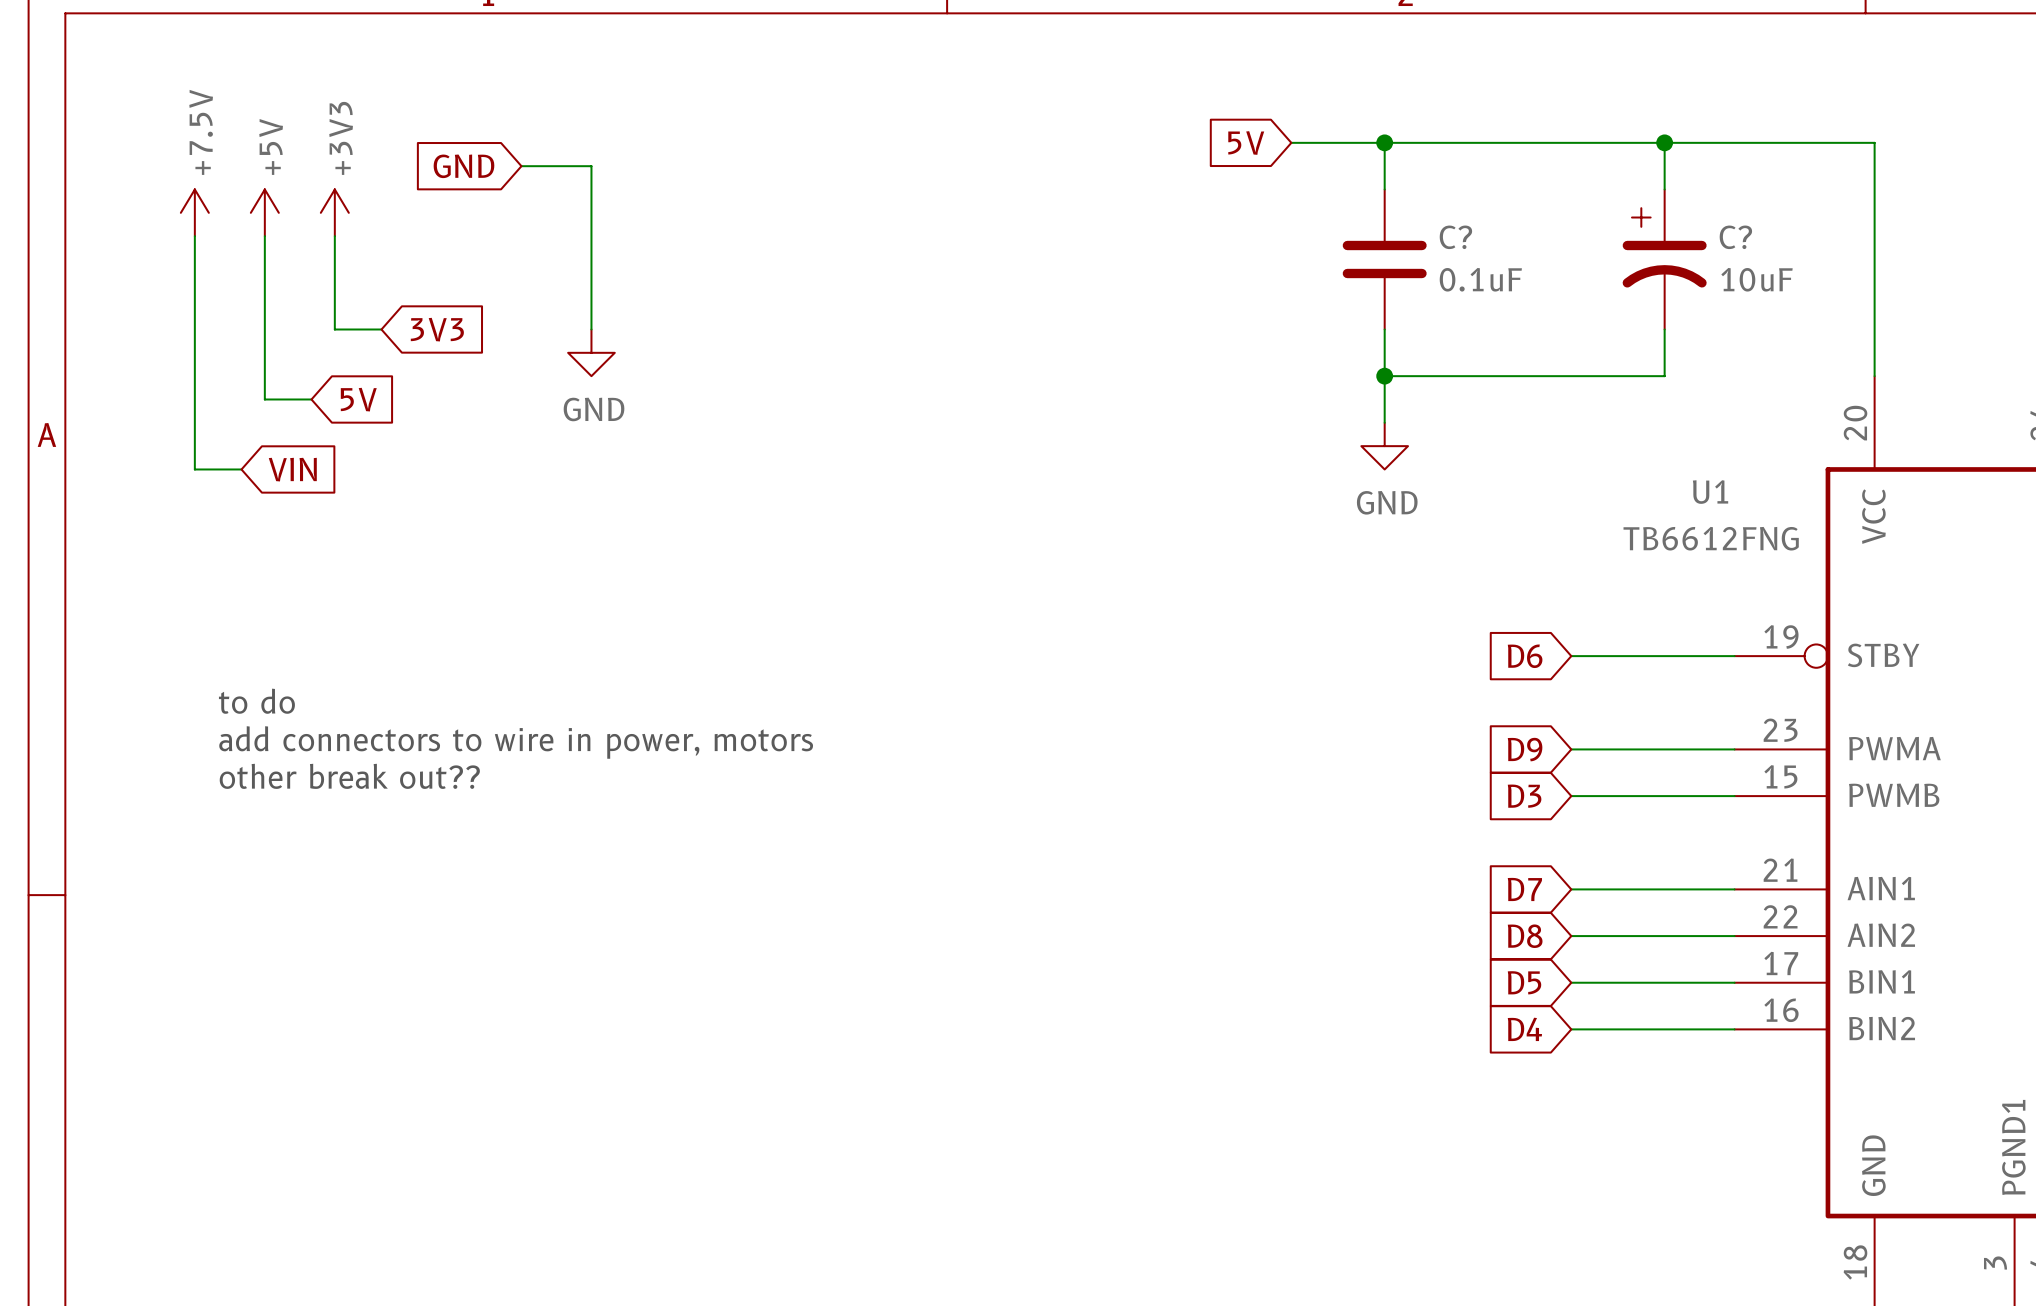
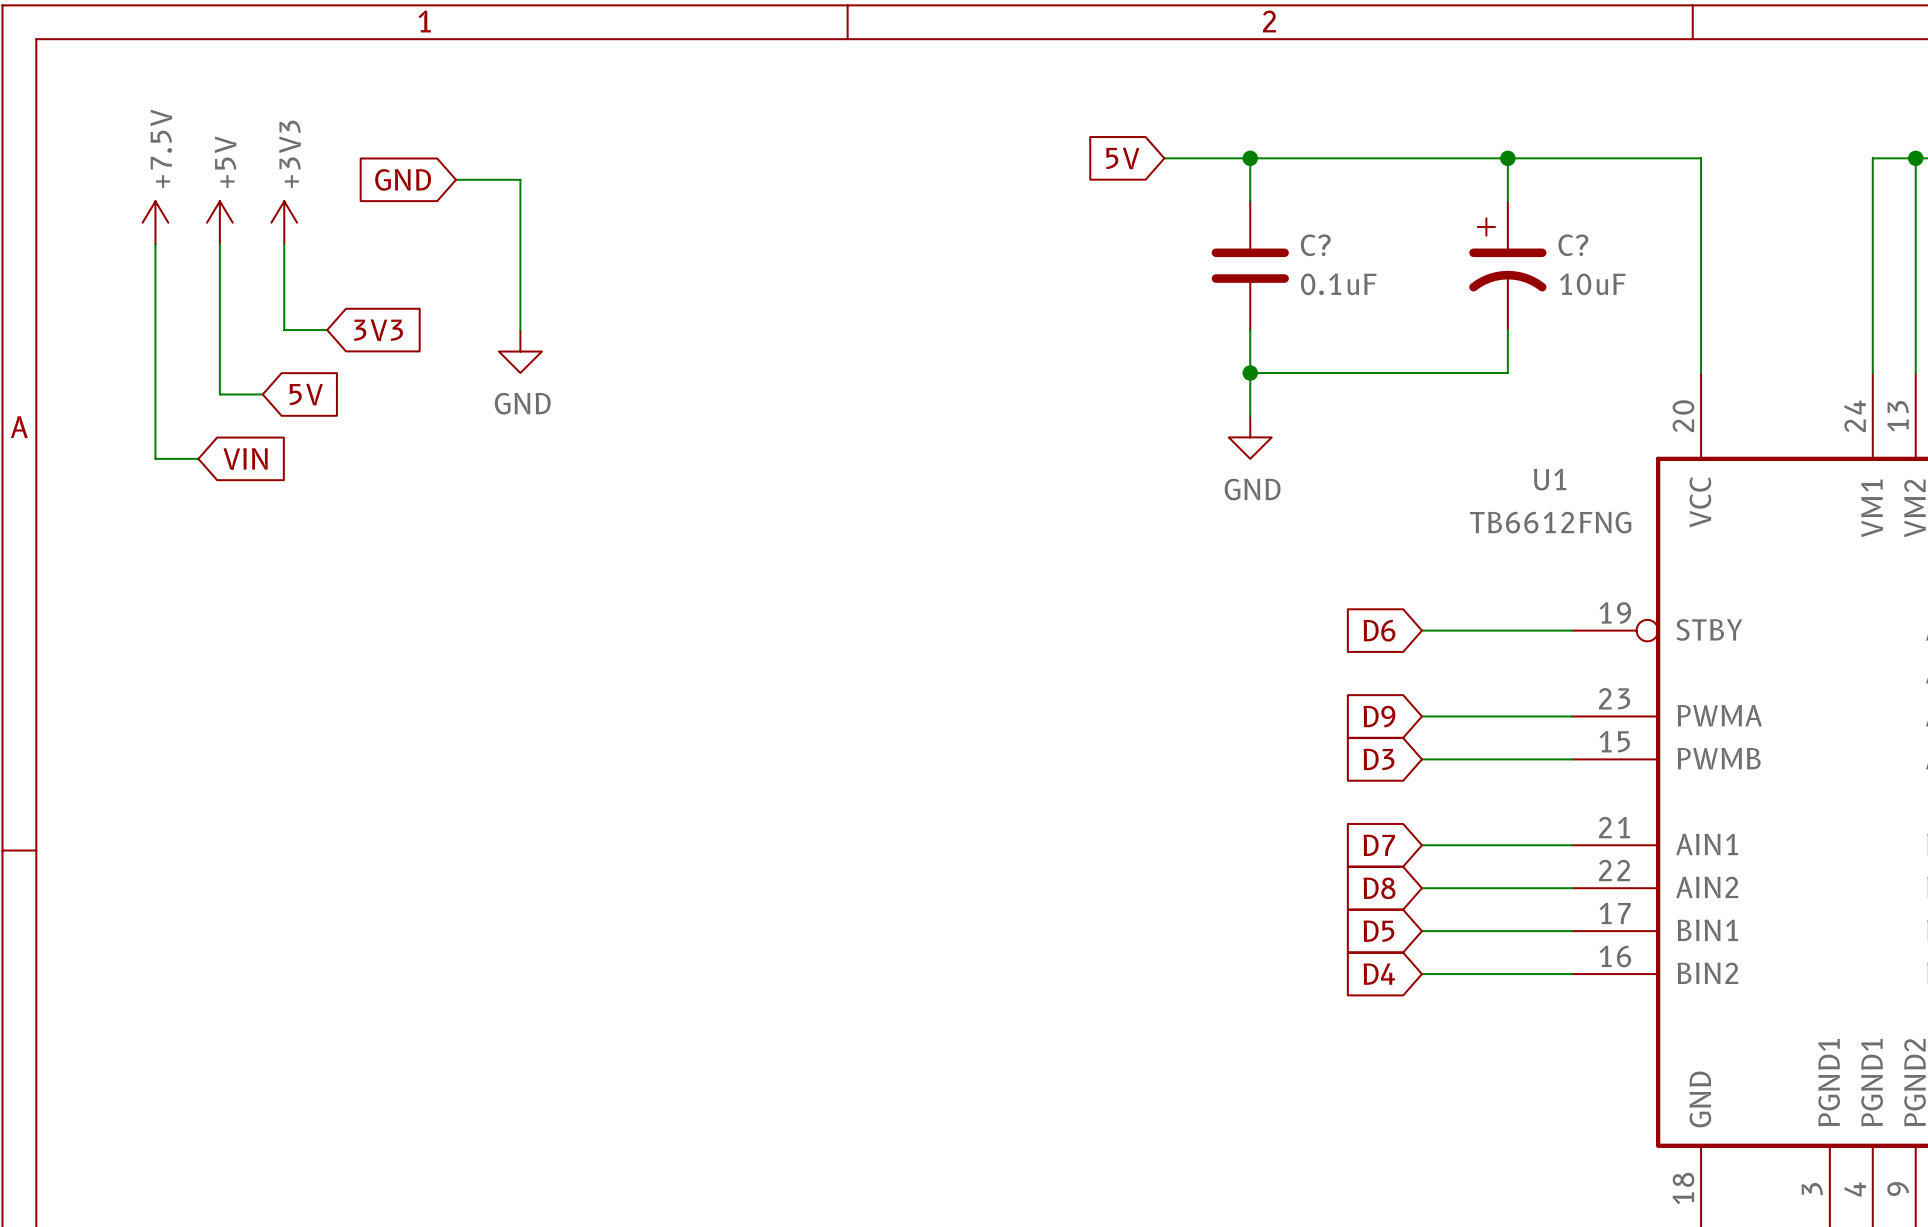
text: to do (256, 701) -> none
text: add connectors to wire in power, motors (516, 742) -> none
text: other break out?? (349, 776) -> none

